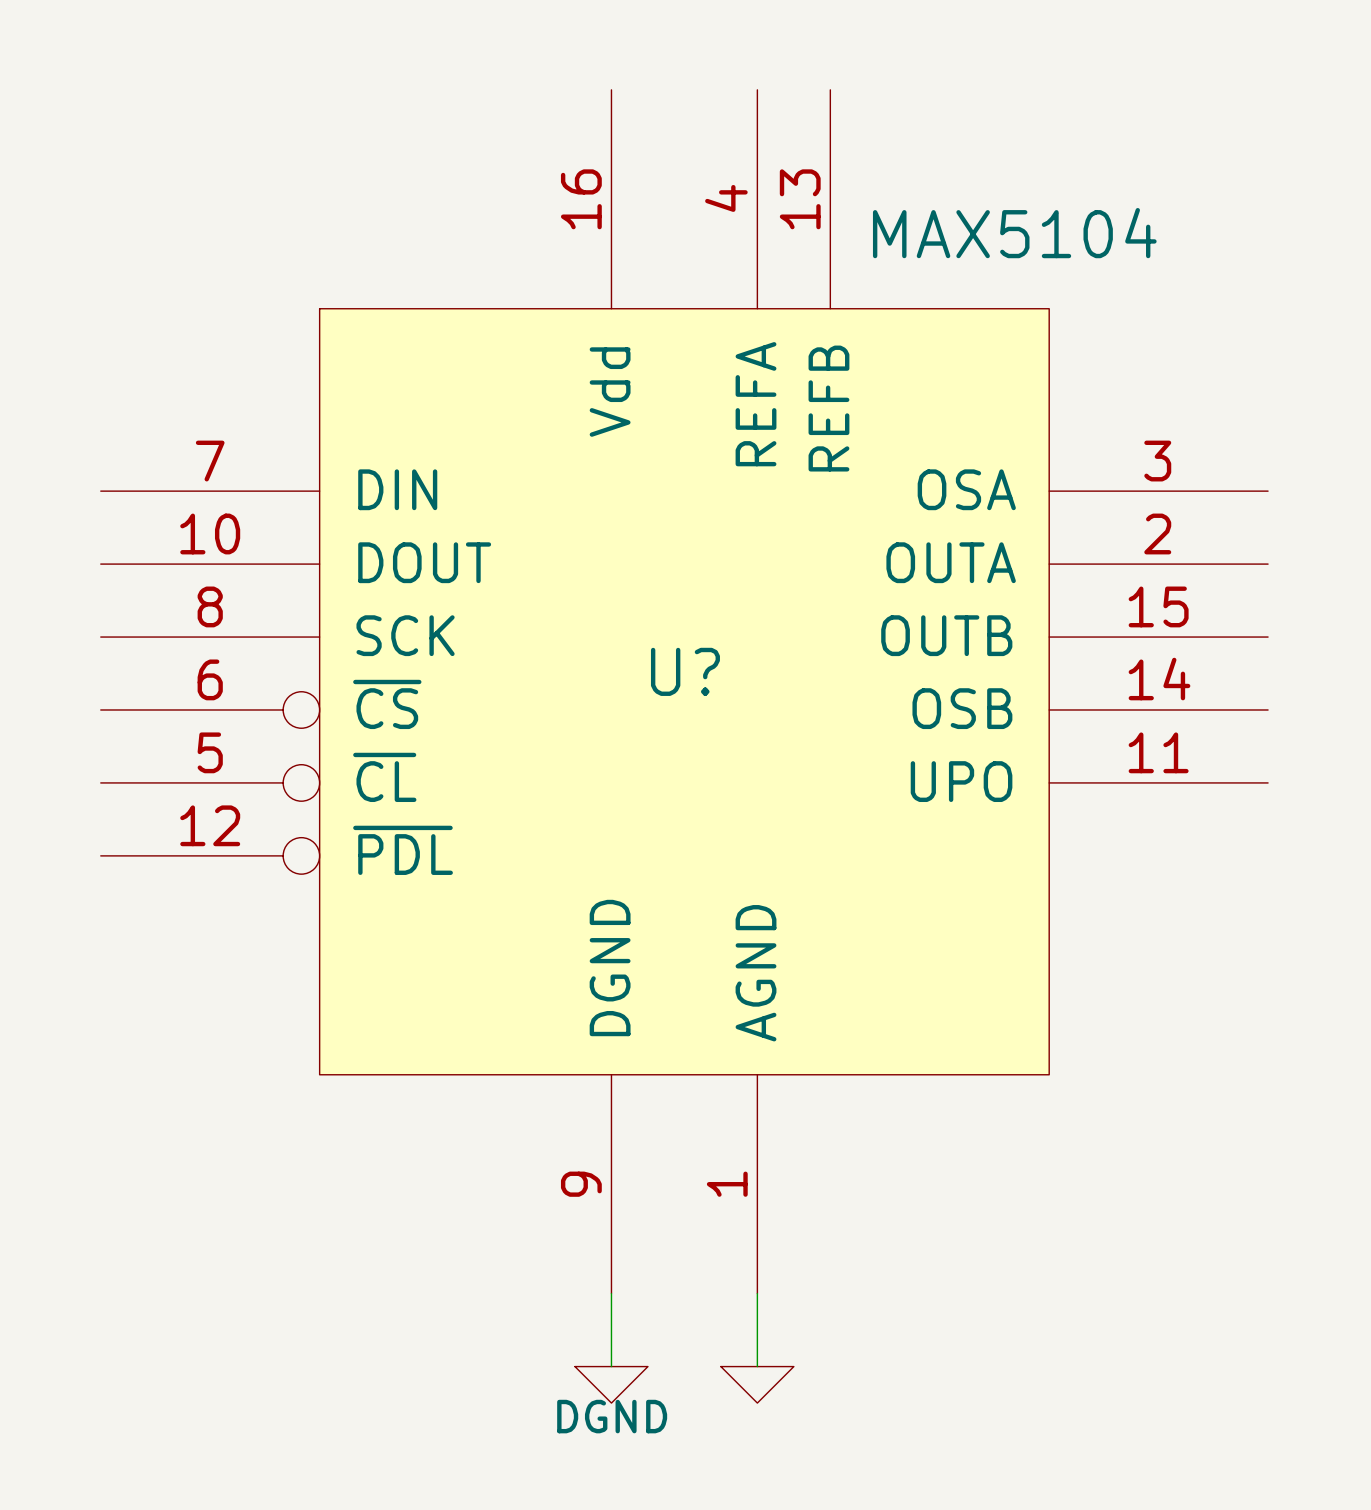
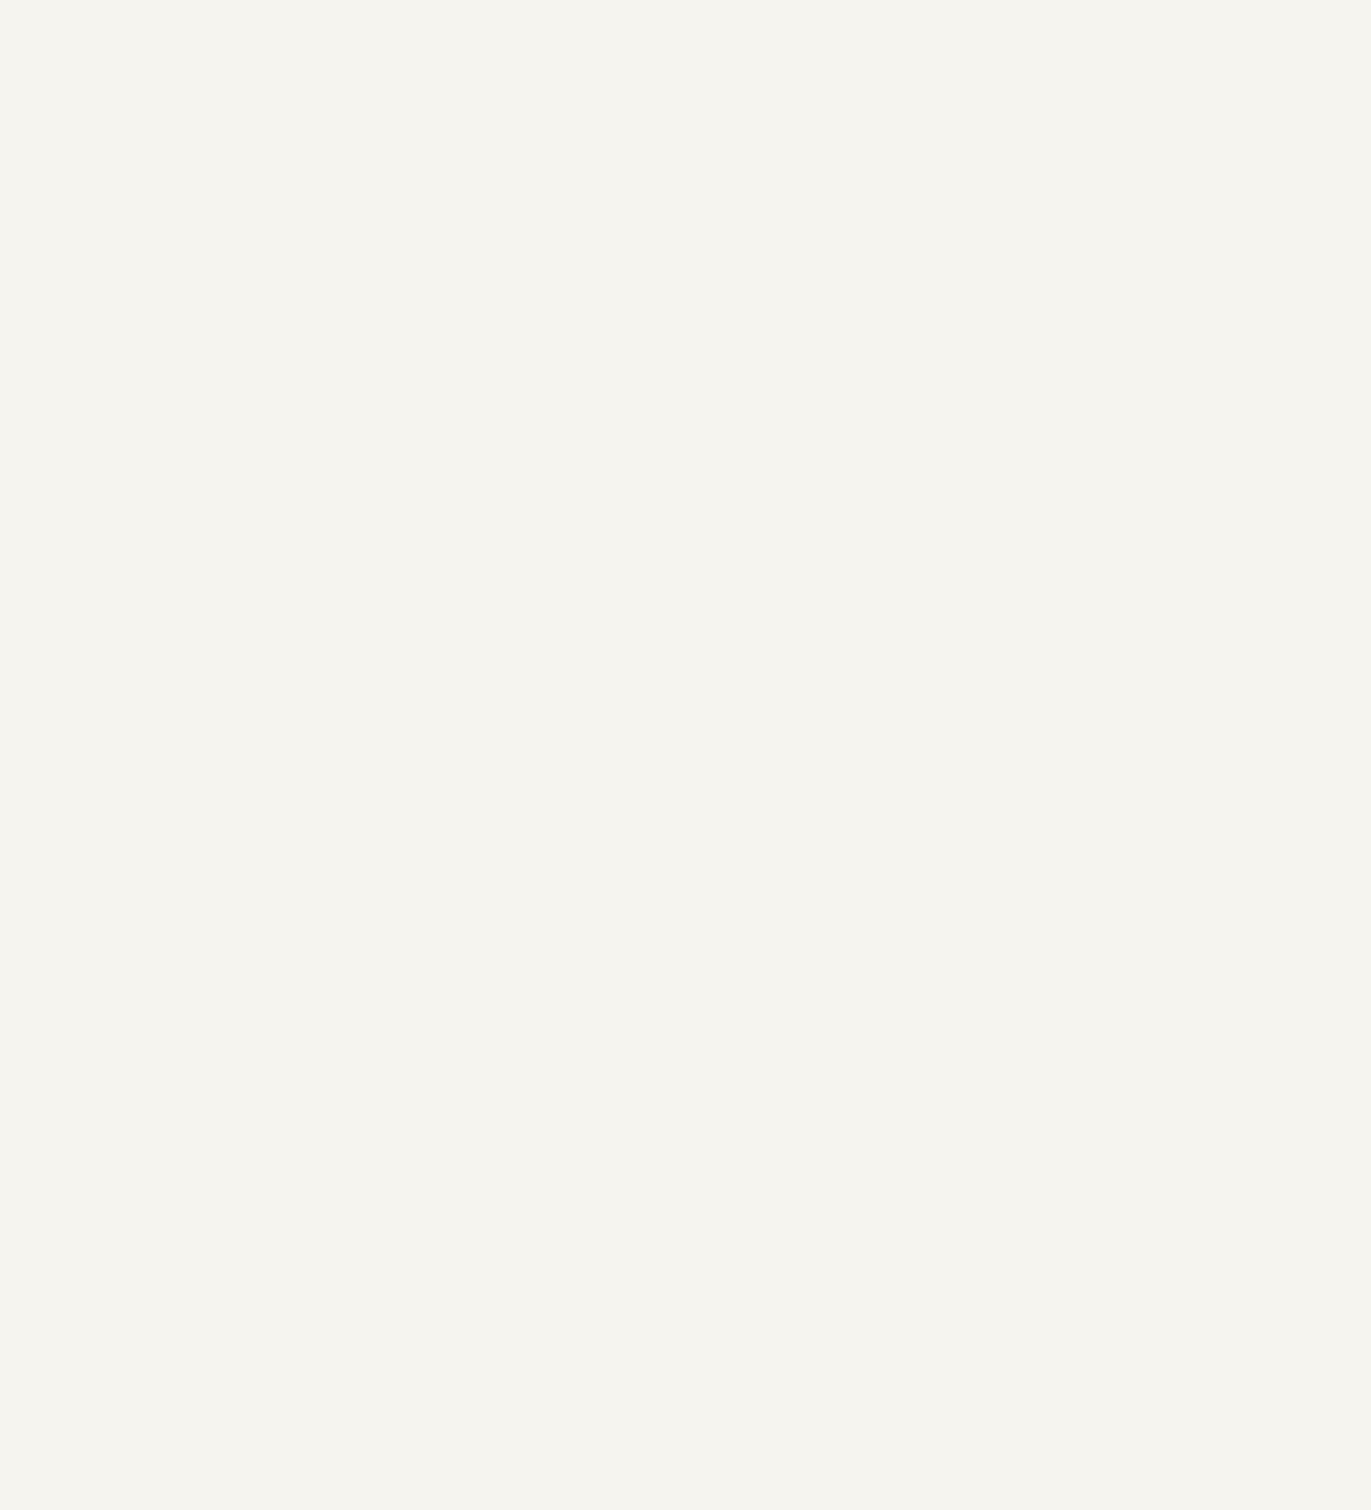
U?: MAX5104 (684, 691) -> none
wire: (611, 1293) (611, 1366) -> none
wire: (757, 1293) (757, 1366) -> none
power symbol: DGND (611, 1384) -> none
power symbol: (757, 1384) -> none

